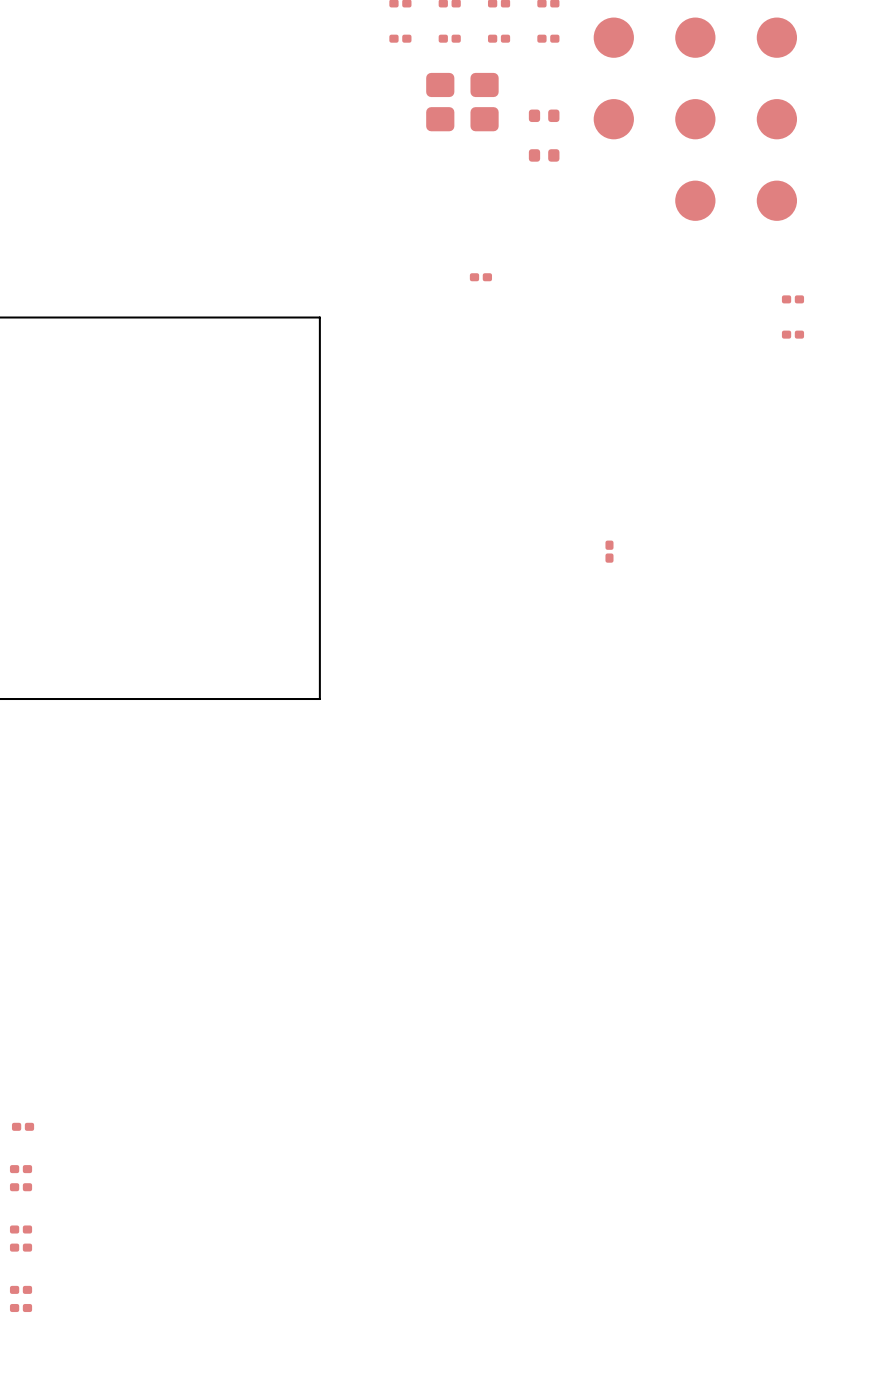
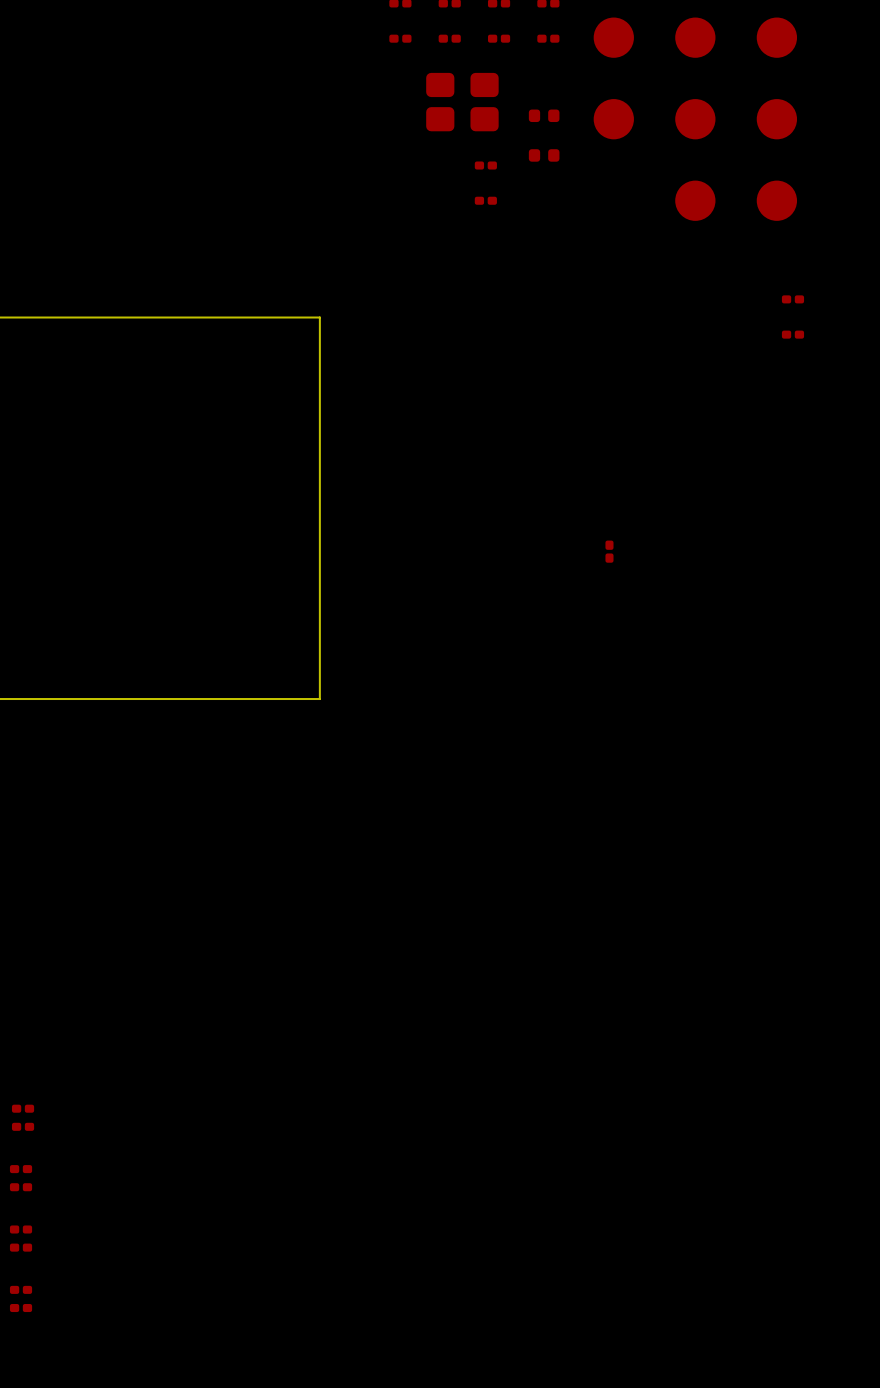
part: none -> (485, 165)
part: none -> (485, 200)
part: (480, 277) -> none
part: none -> (23, 1108)

